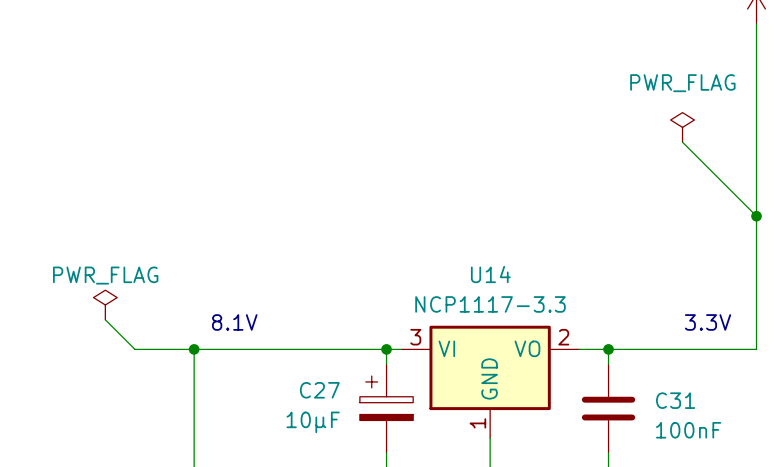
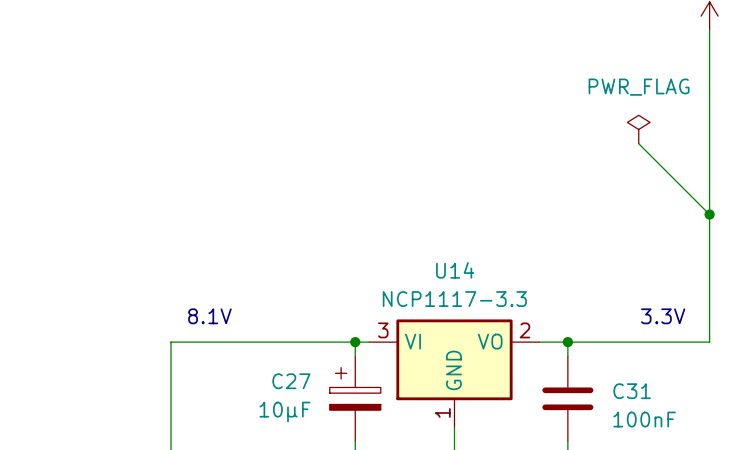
power symbol: PWR_FLAG (105, 305) -> none
wire: (105, 319) (134, 349) (194, 349) -> none
junction: (194, 349) -> none

